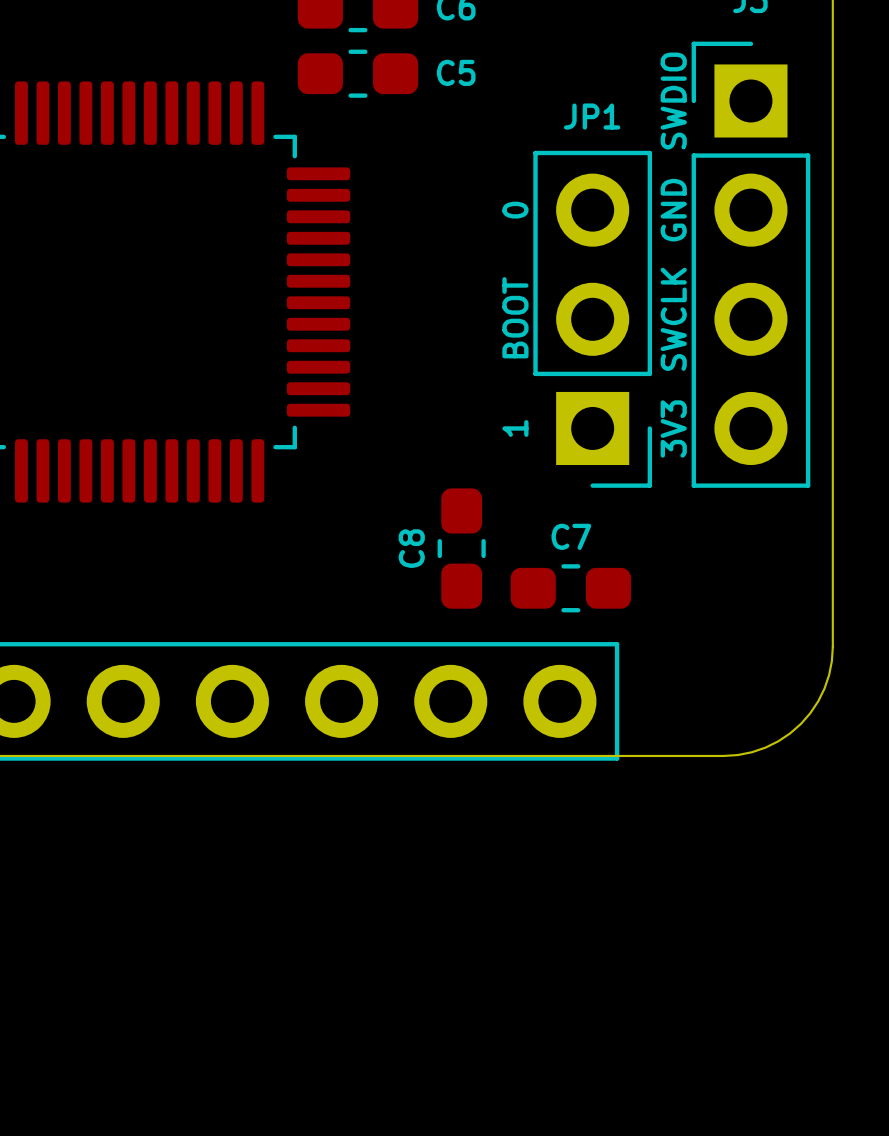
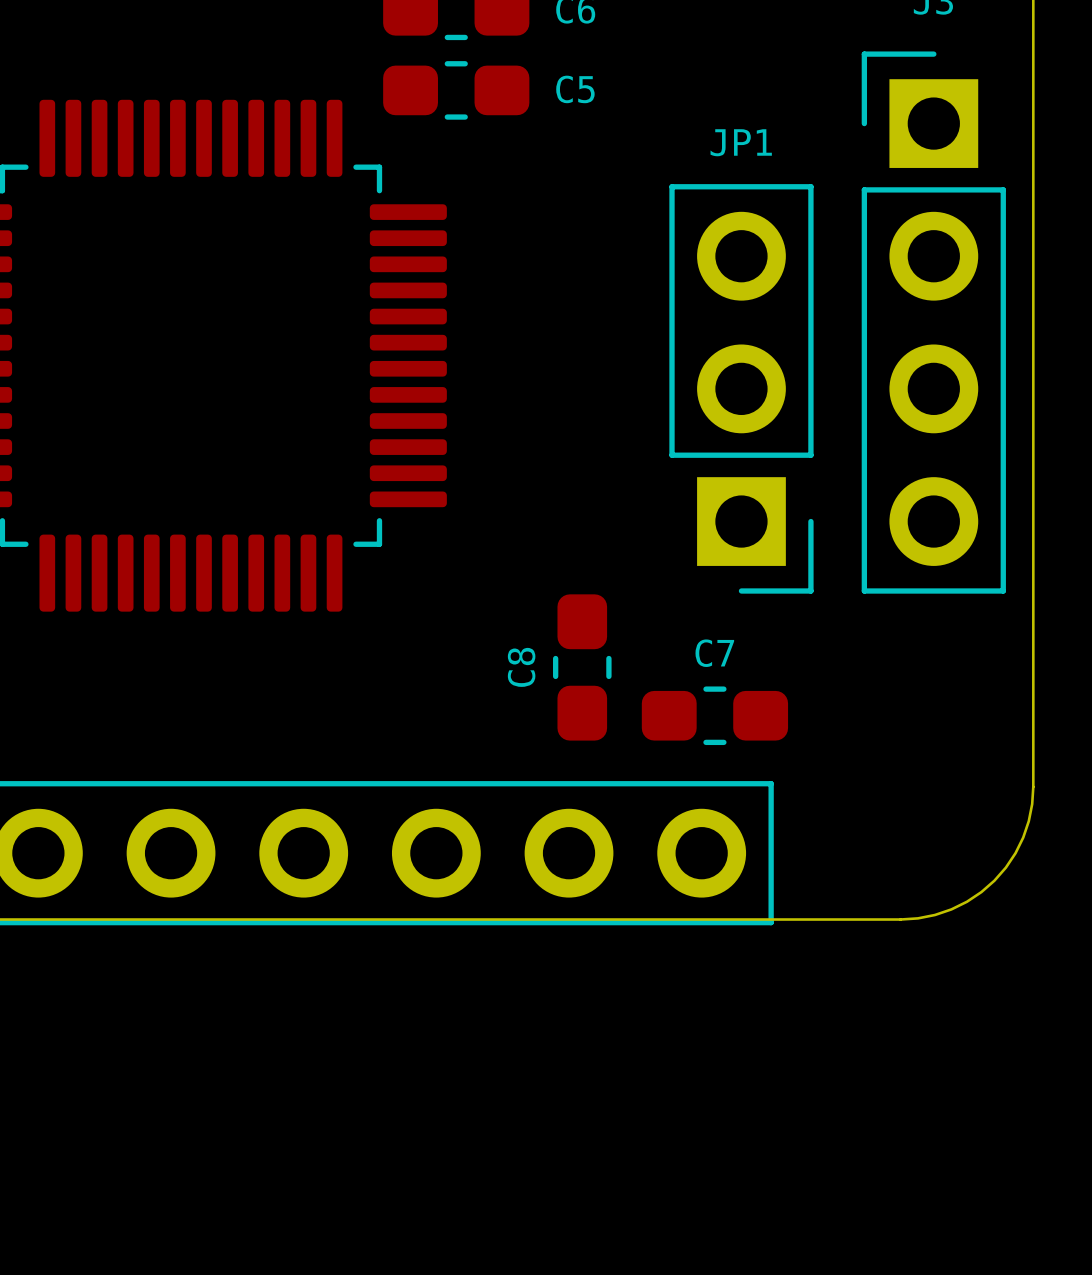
text: SWDIO (673, 100) -> none
text: 0 (515, 210) -> none
text: GND (673, 210) -> none
text: BOOT (515, 317) -> none
text: SWCLK (673, 319) -> none
text: 1 (515, 428) -> none
text: 3V3 (673, 428) -> none

